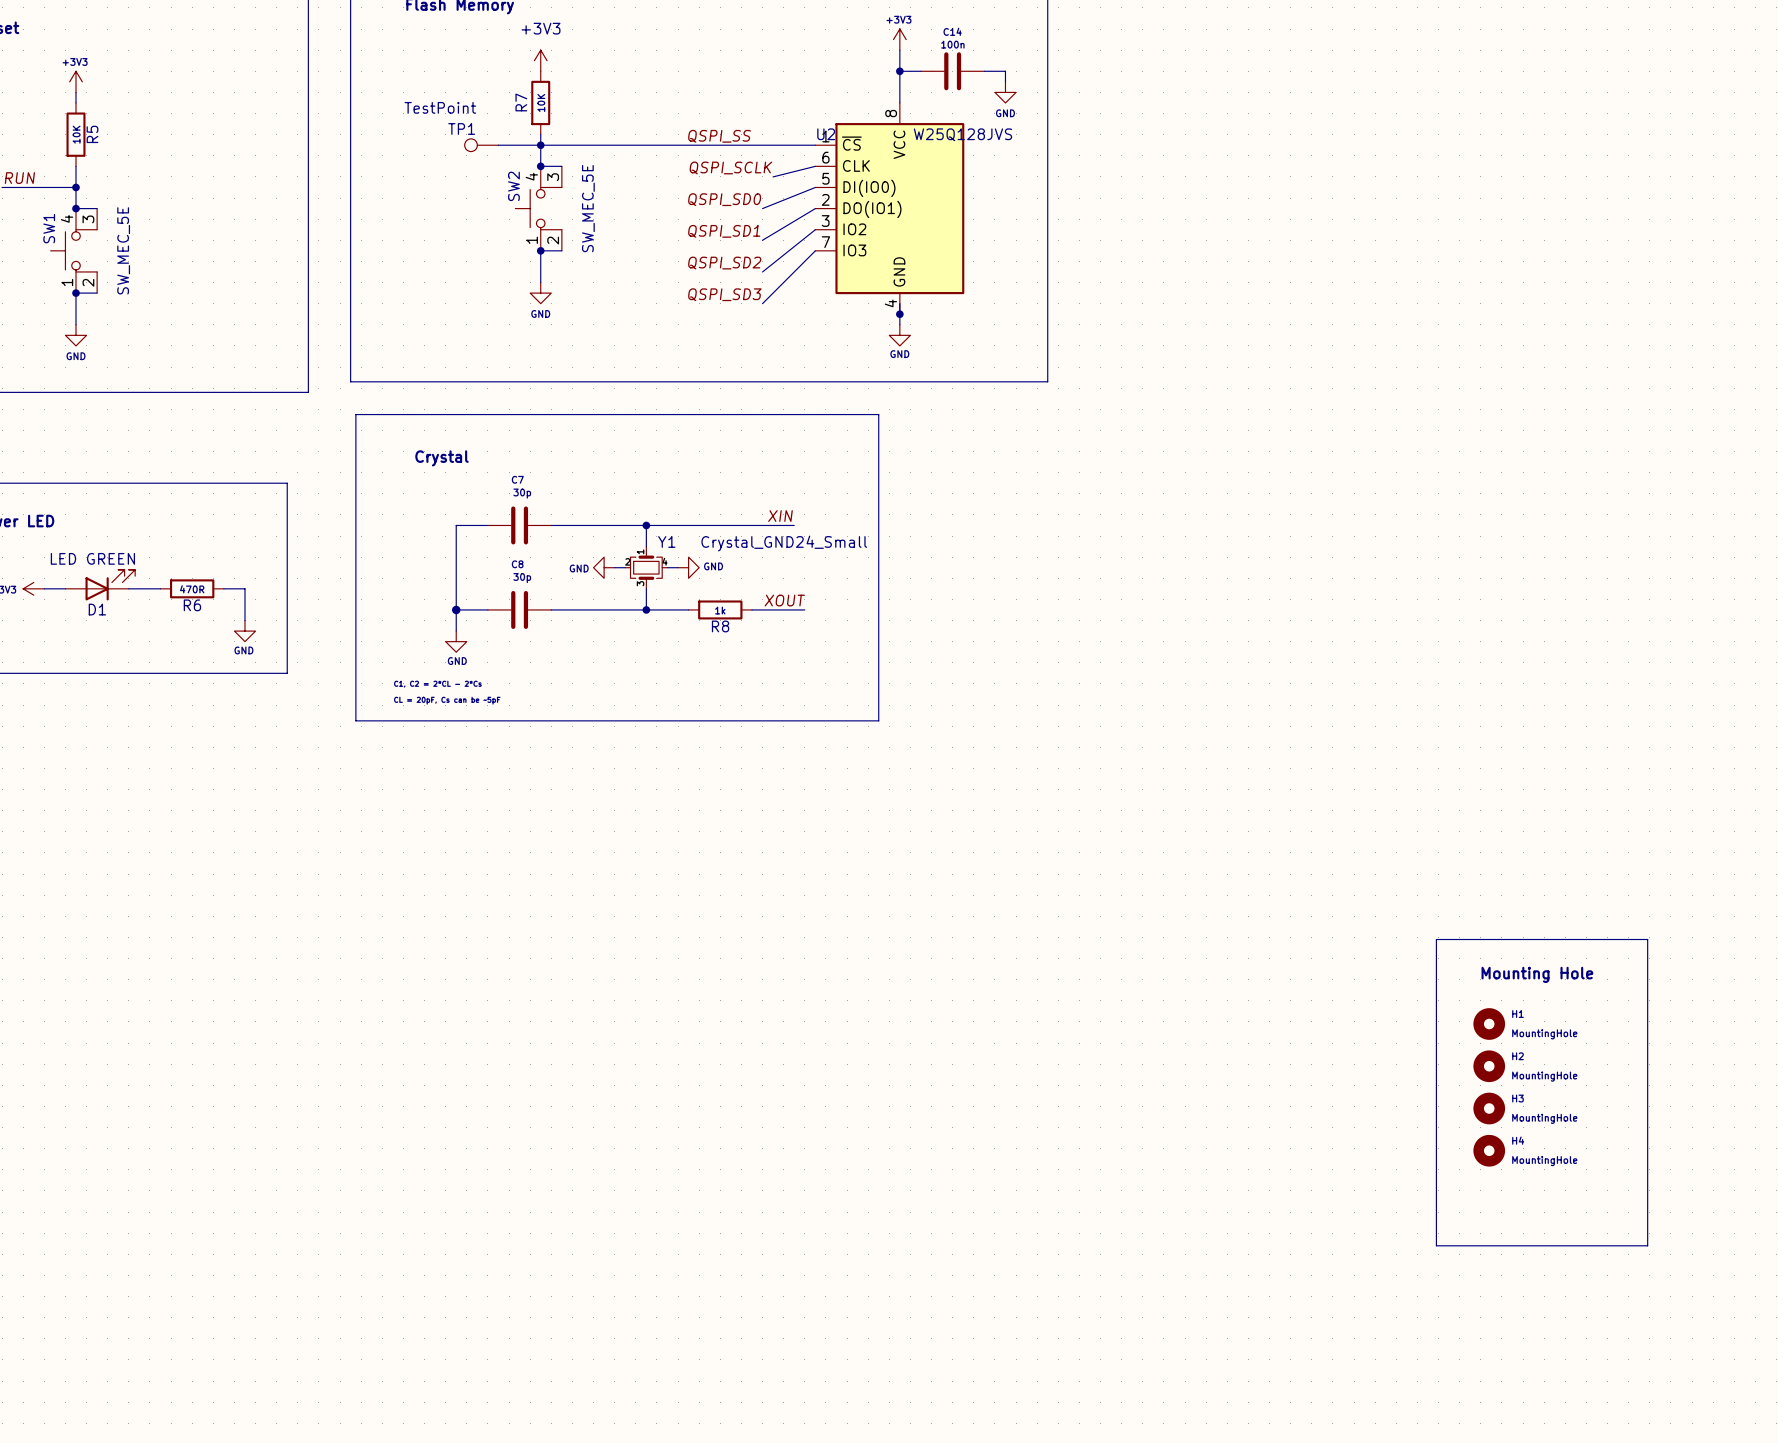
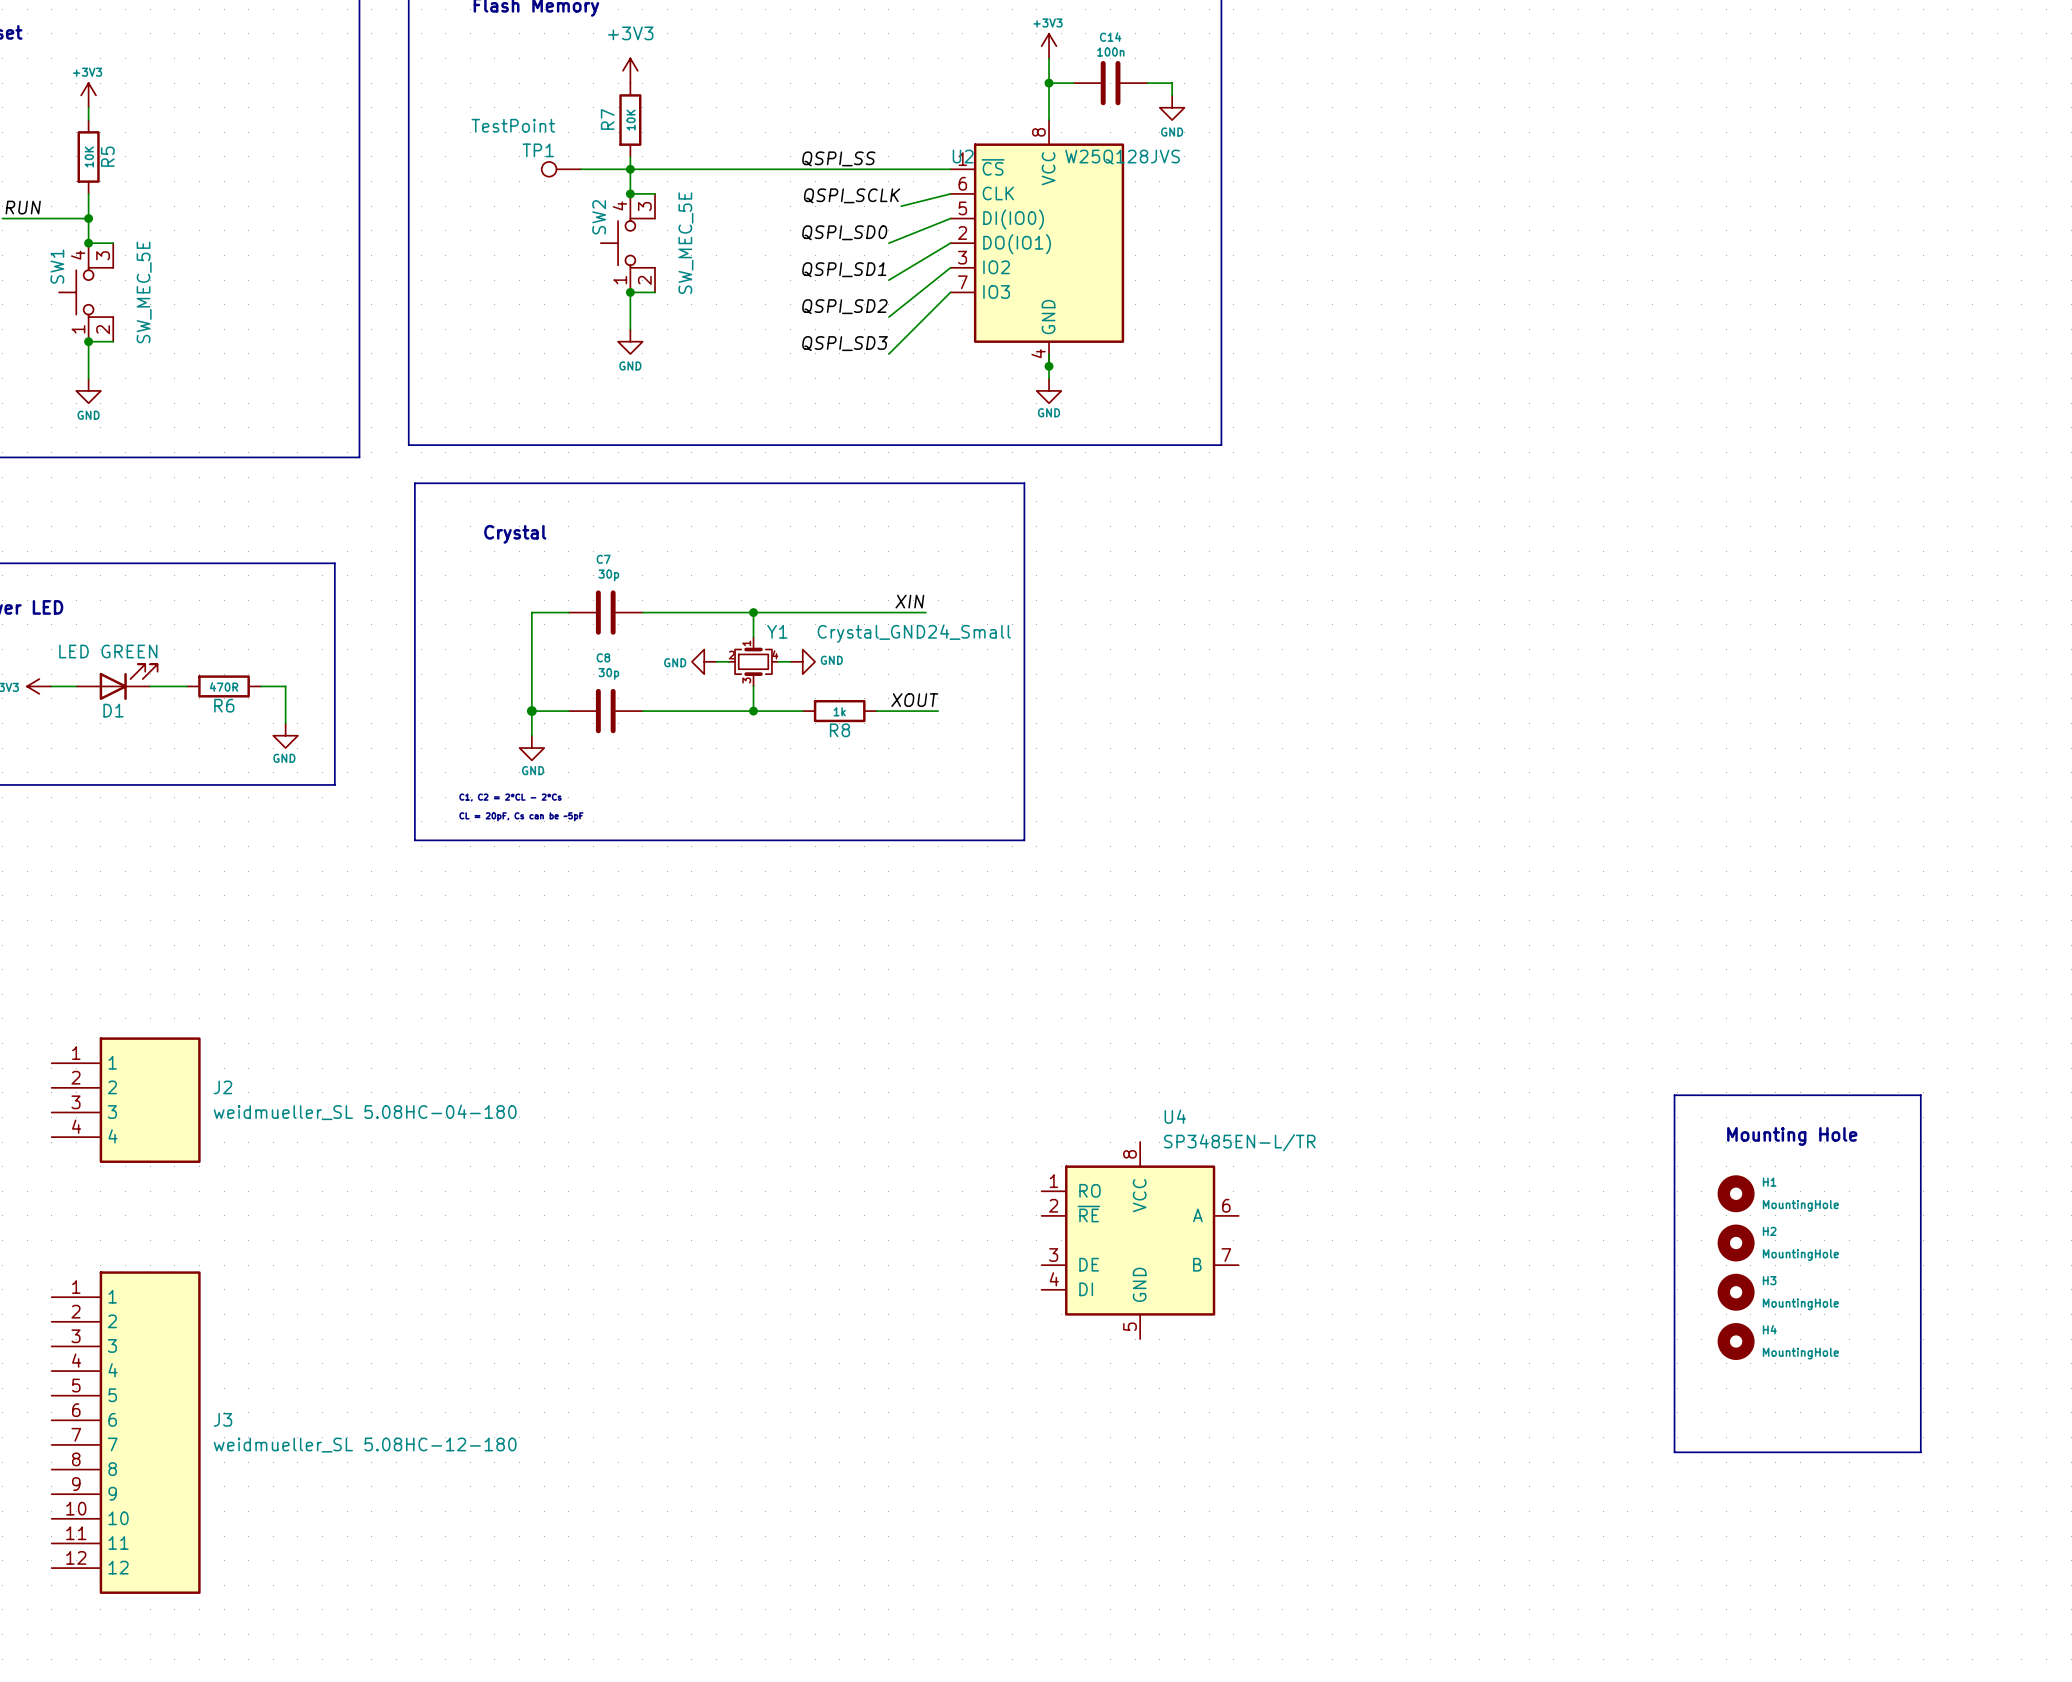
J2: none -> weidmueller_SL 5.08HC-04-180 (126, 1100)
U4: none -> SP3485EN-L/TR (1140, 1240)
J3: none -> weidmueller_SL 5.08HC-12-180 (126, 1432)

